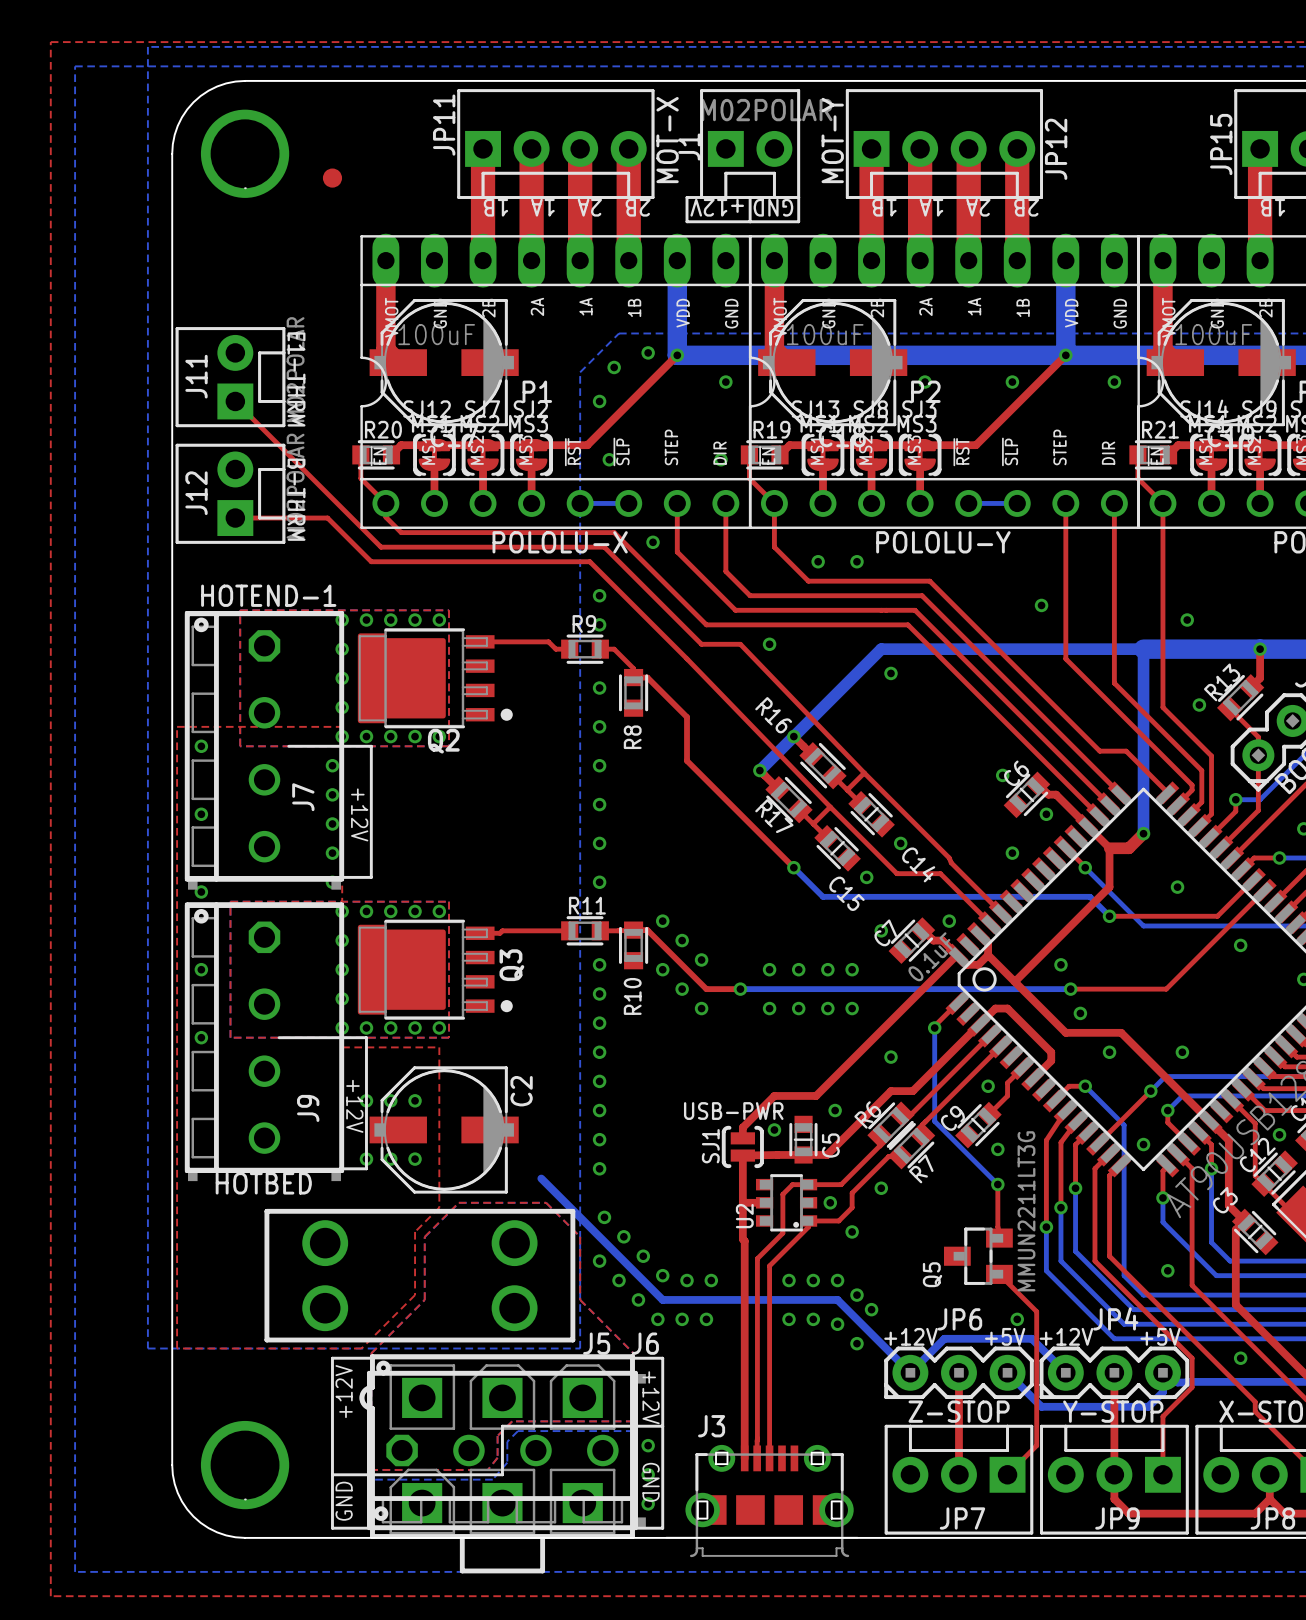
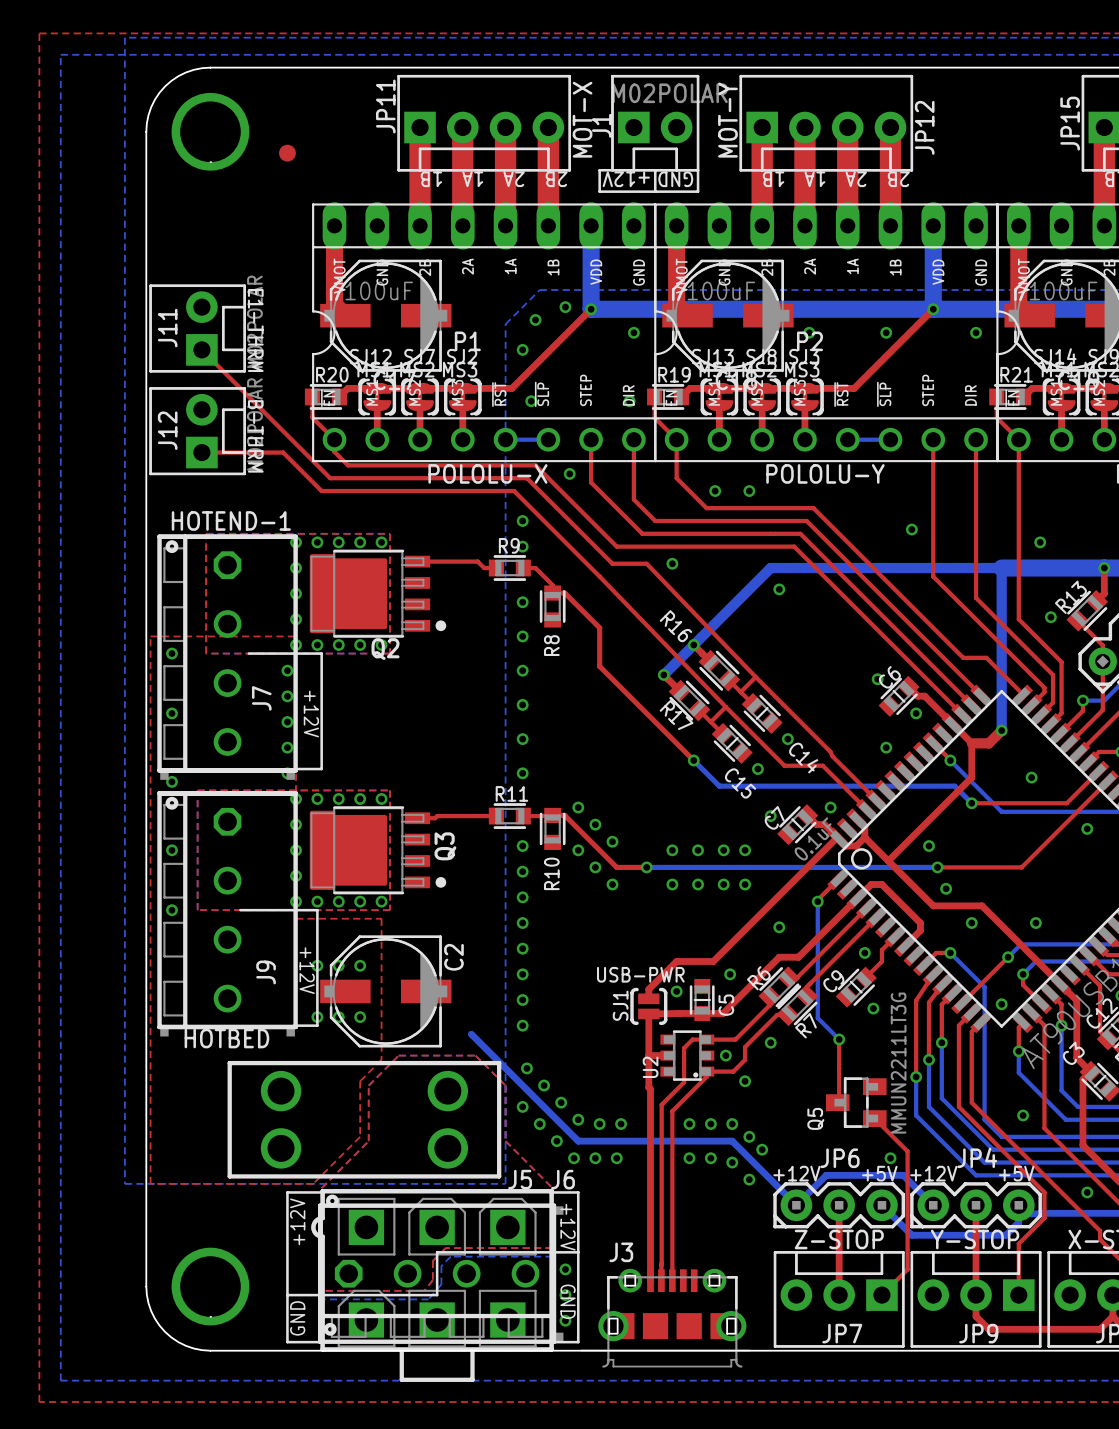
bottom track: (934, 1121) (997, 1184) -> (817, 983) (817, 1018) (839, 1039)
top track: none -> (839, 1039) (837, 1102)
top track: (997, 1184) (997, 1227) (1001, 1238) (999, 1238) -> none
via position: (997, 1184) -> (839, 1039)

